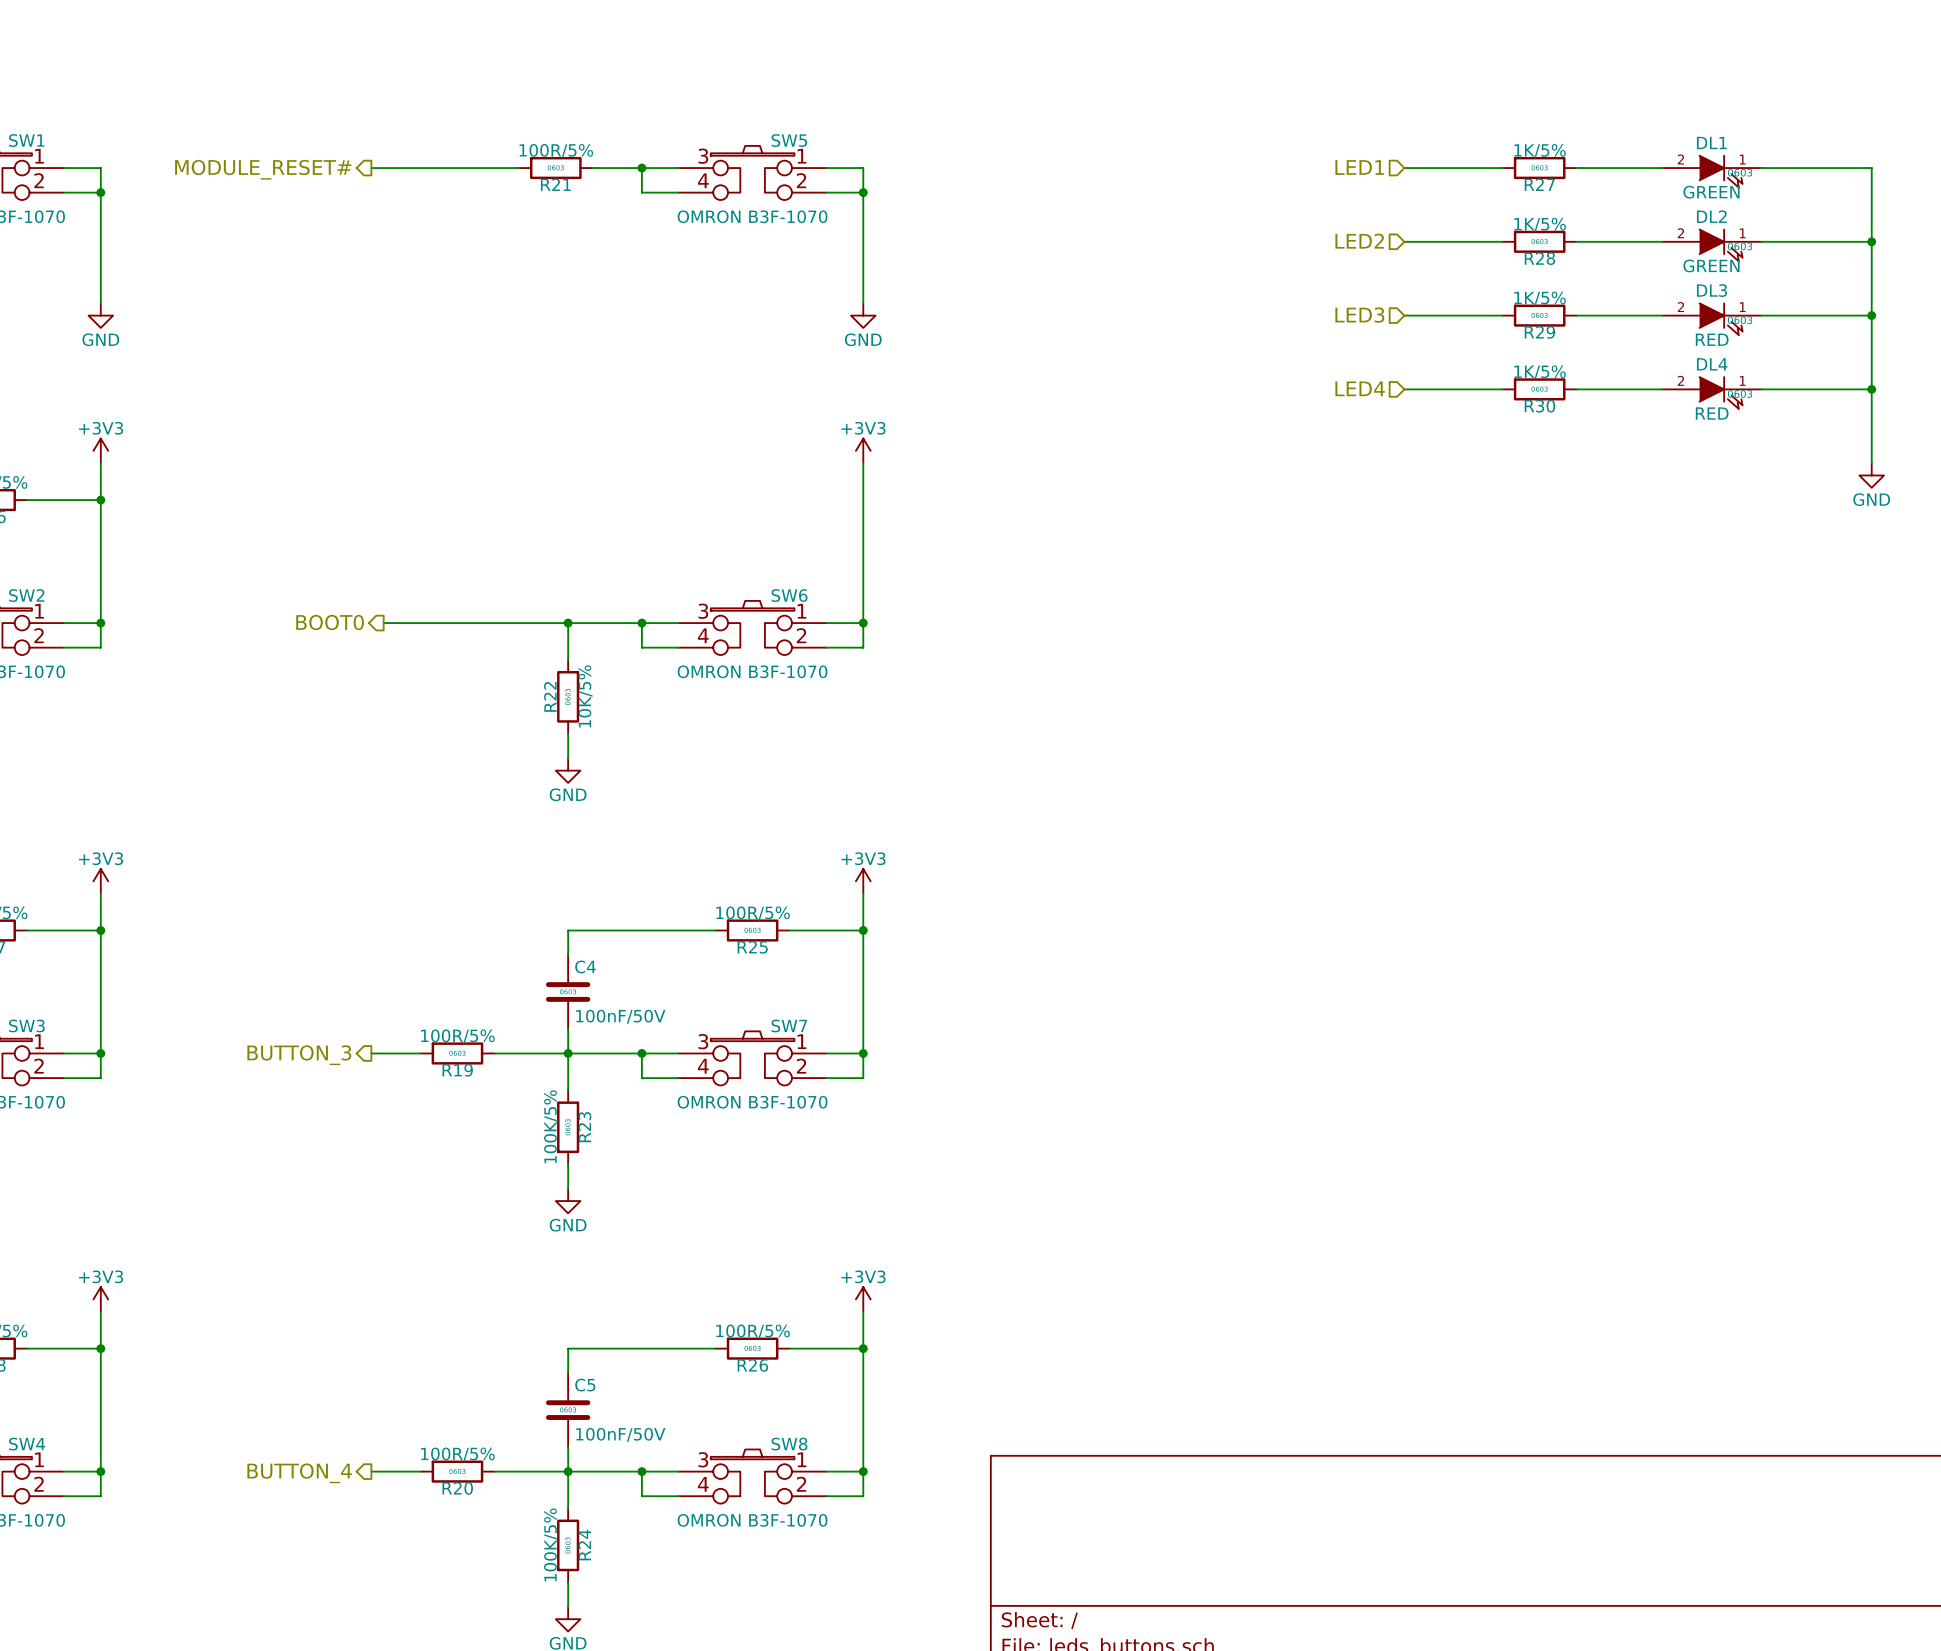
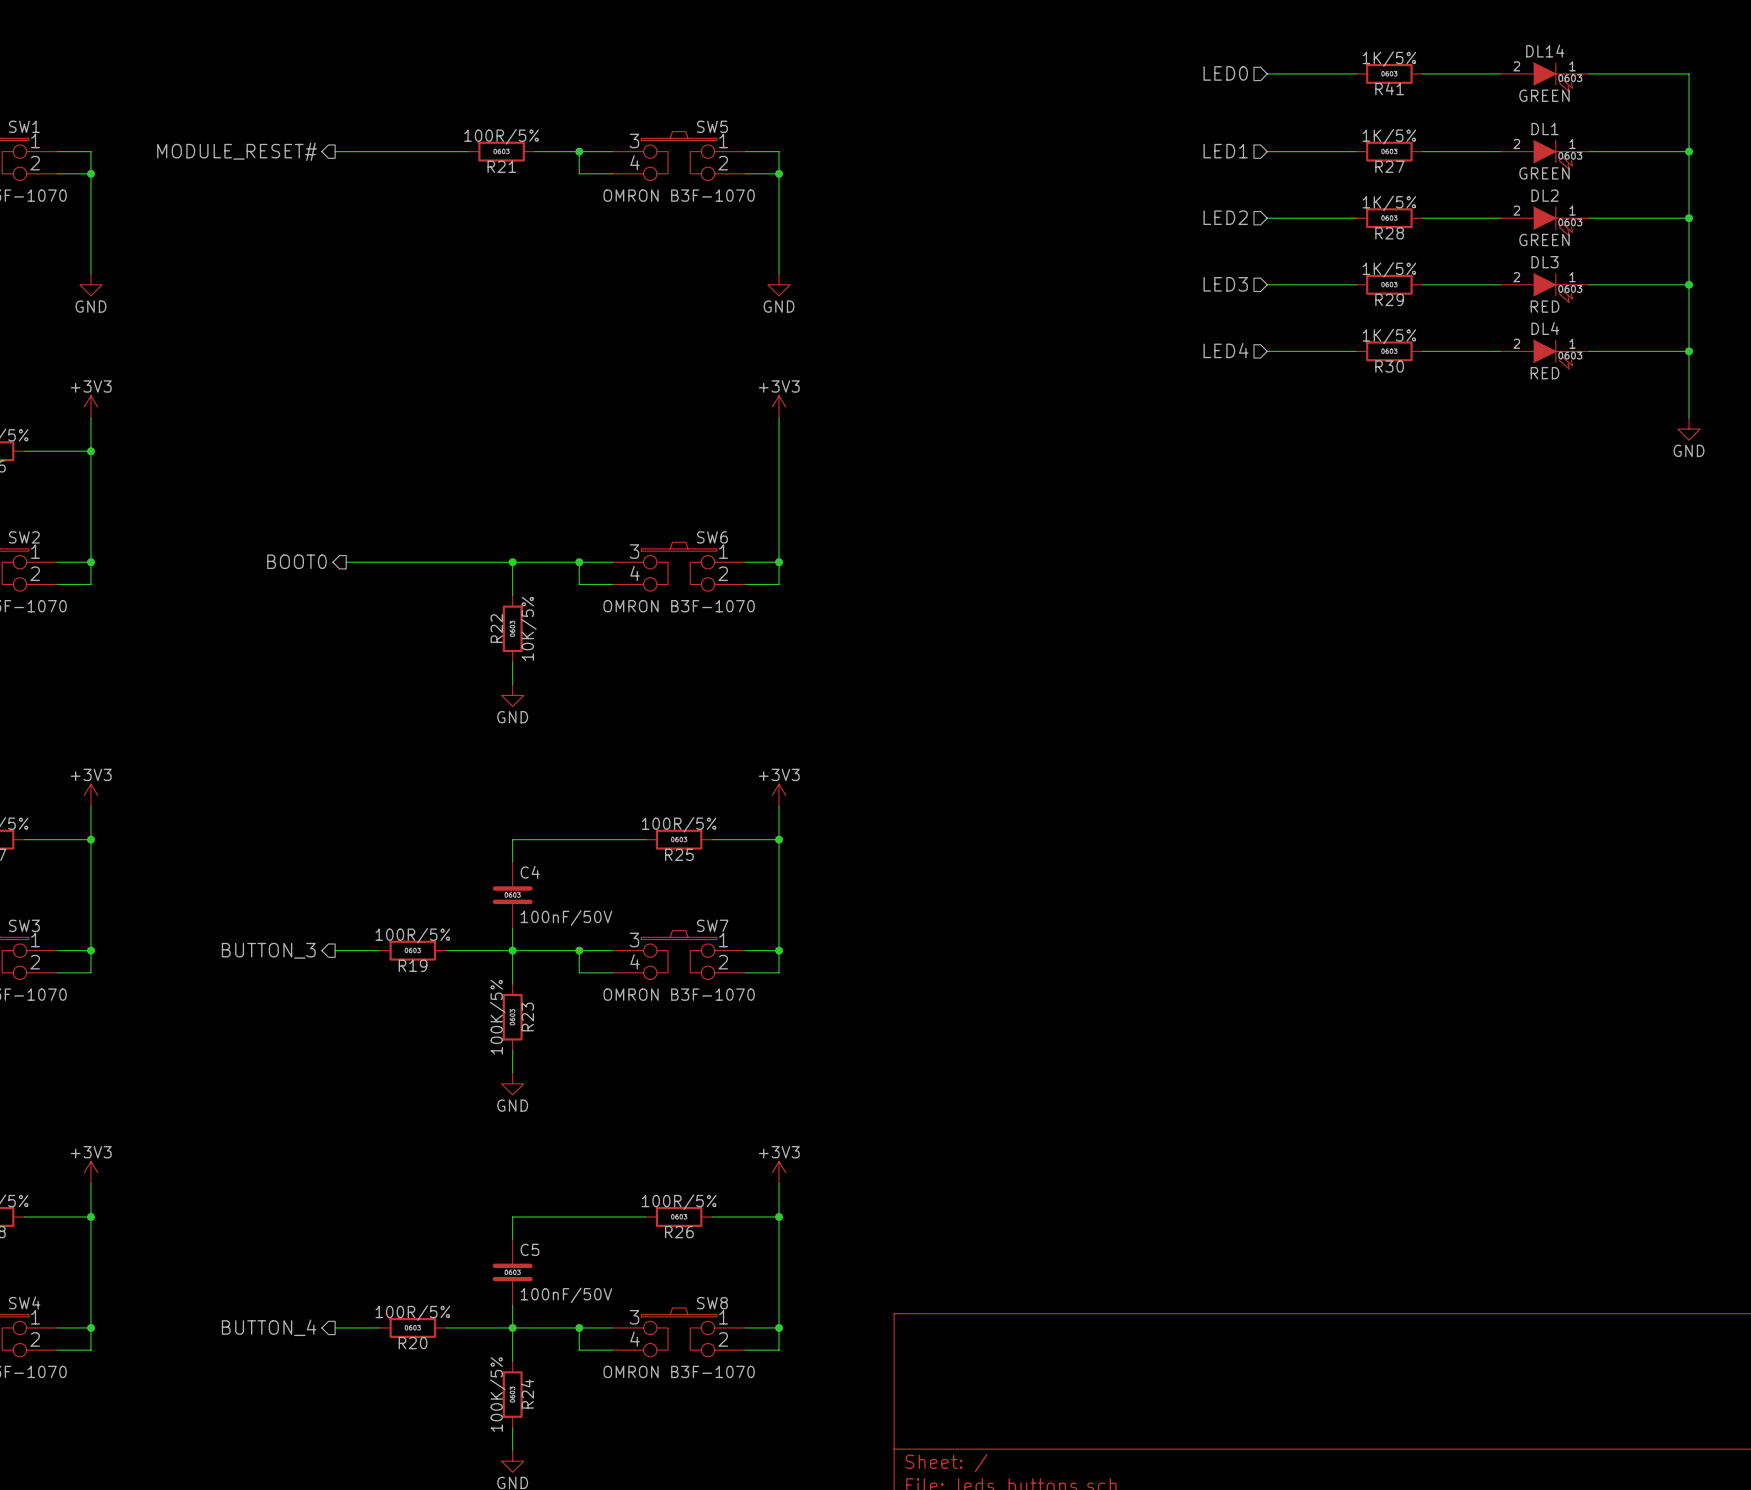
hierarchical label: none -> LED0 (1225, 73)
wire: none -> (1267, 73) (1356, 73)
R41: none -> 1K/5% (1389, 73)
wire: none -> (1422, 73) (1500, 73)
wire: none -> (1589, 73) (1689, 73) (1689, 151)
DL14: none -> GREEN (1544, 77)
junction: none -> (1689, 151)

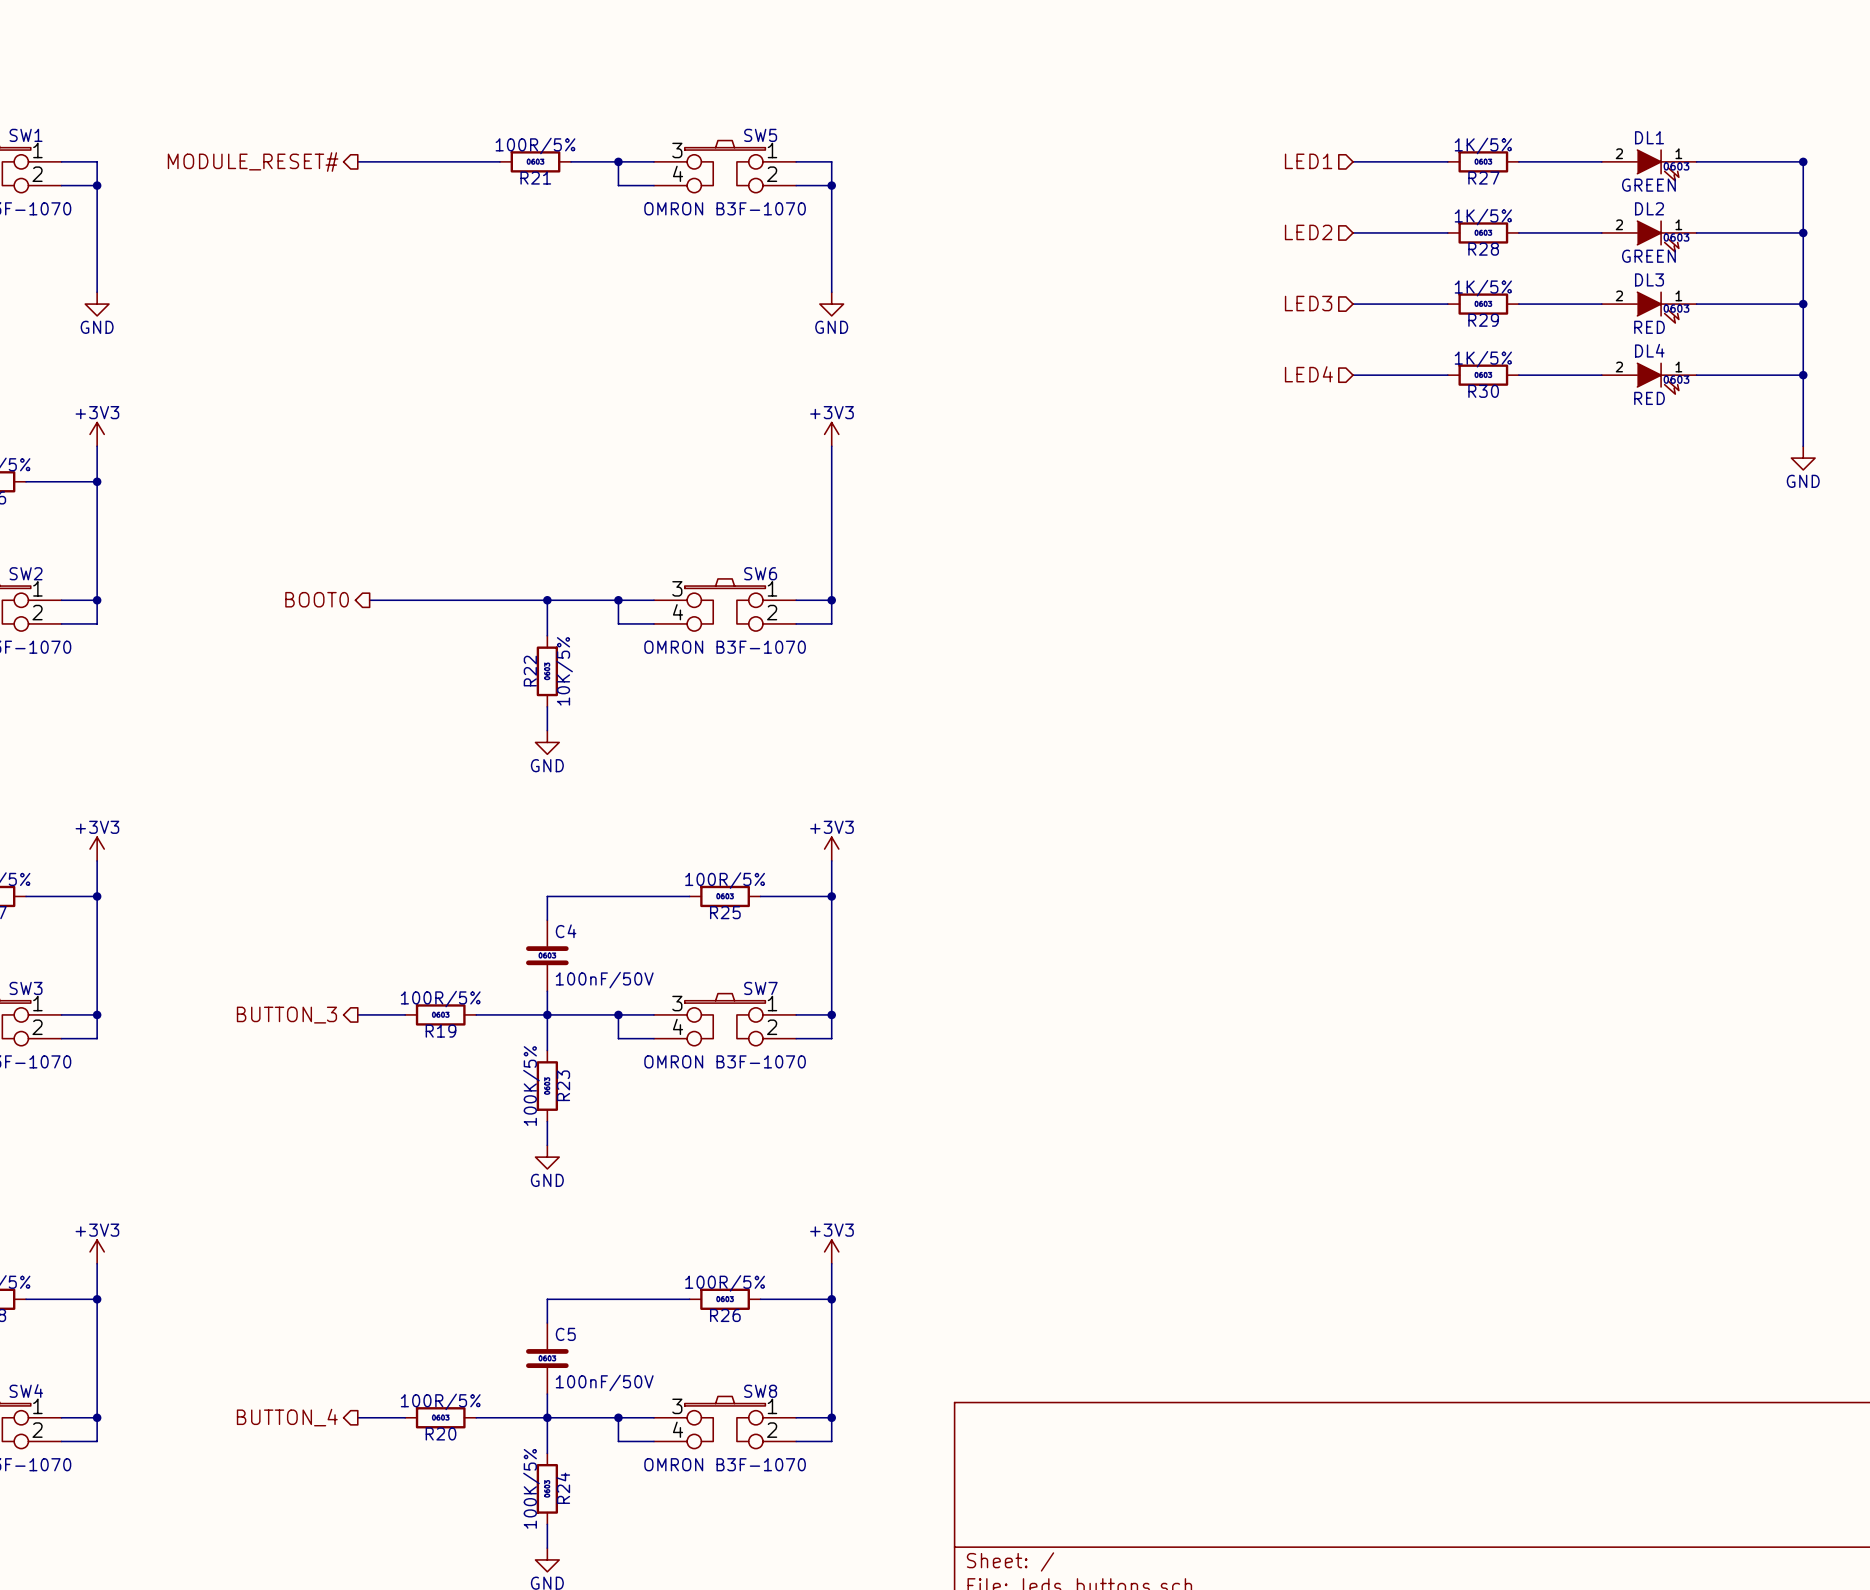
hierarchical label: LED0 (1225, 73) -> none
wire: (1267, 73) (1356, 73) -> none
R41: 1K/5% (1389, 73) -> none
wire: (1422, 73) (1500, 73) -> none
wire: (1589, 73) (1689, 73) (1689, 151) -> none
DL14: GREEN (1544, 77) -> none

